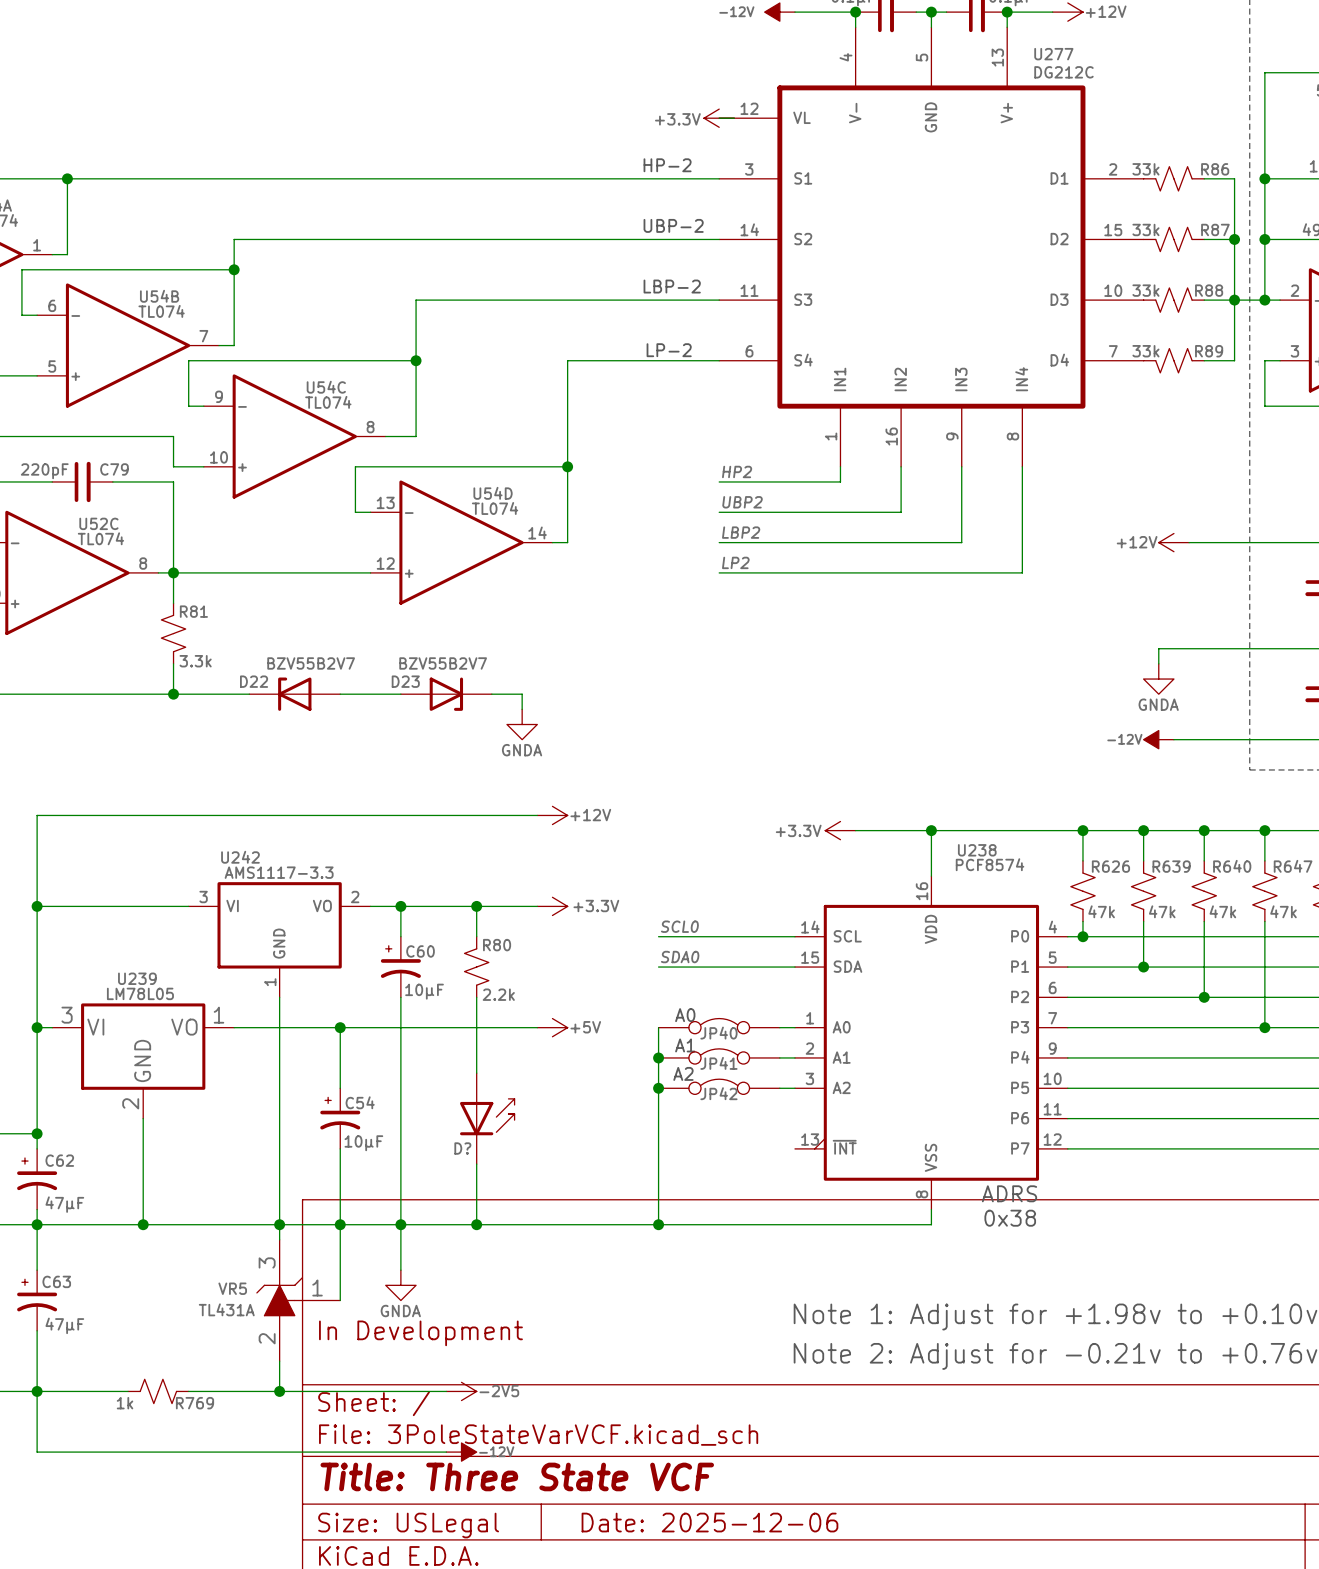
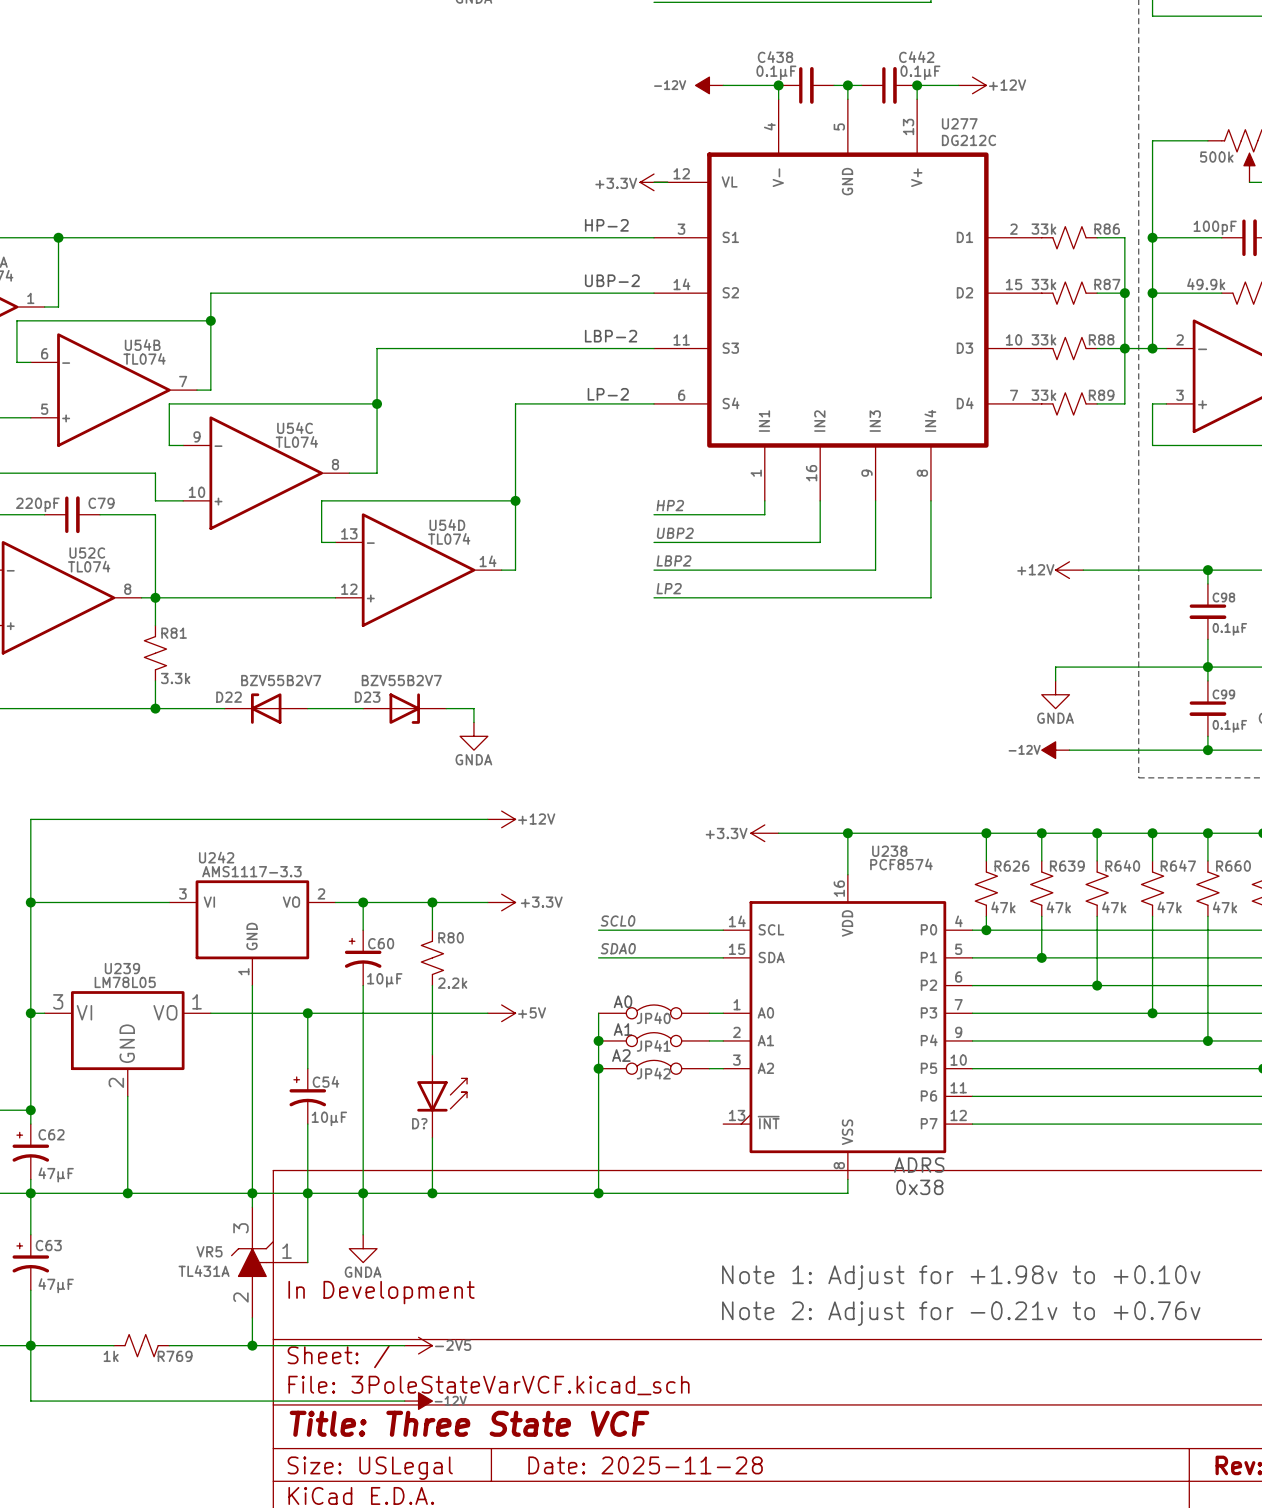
title block: Date: 2025-12-06 (709, 1522) -> Date: 2025-11-28 (645, 1465)

